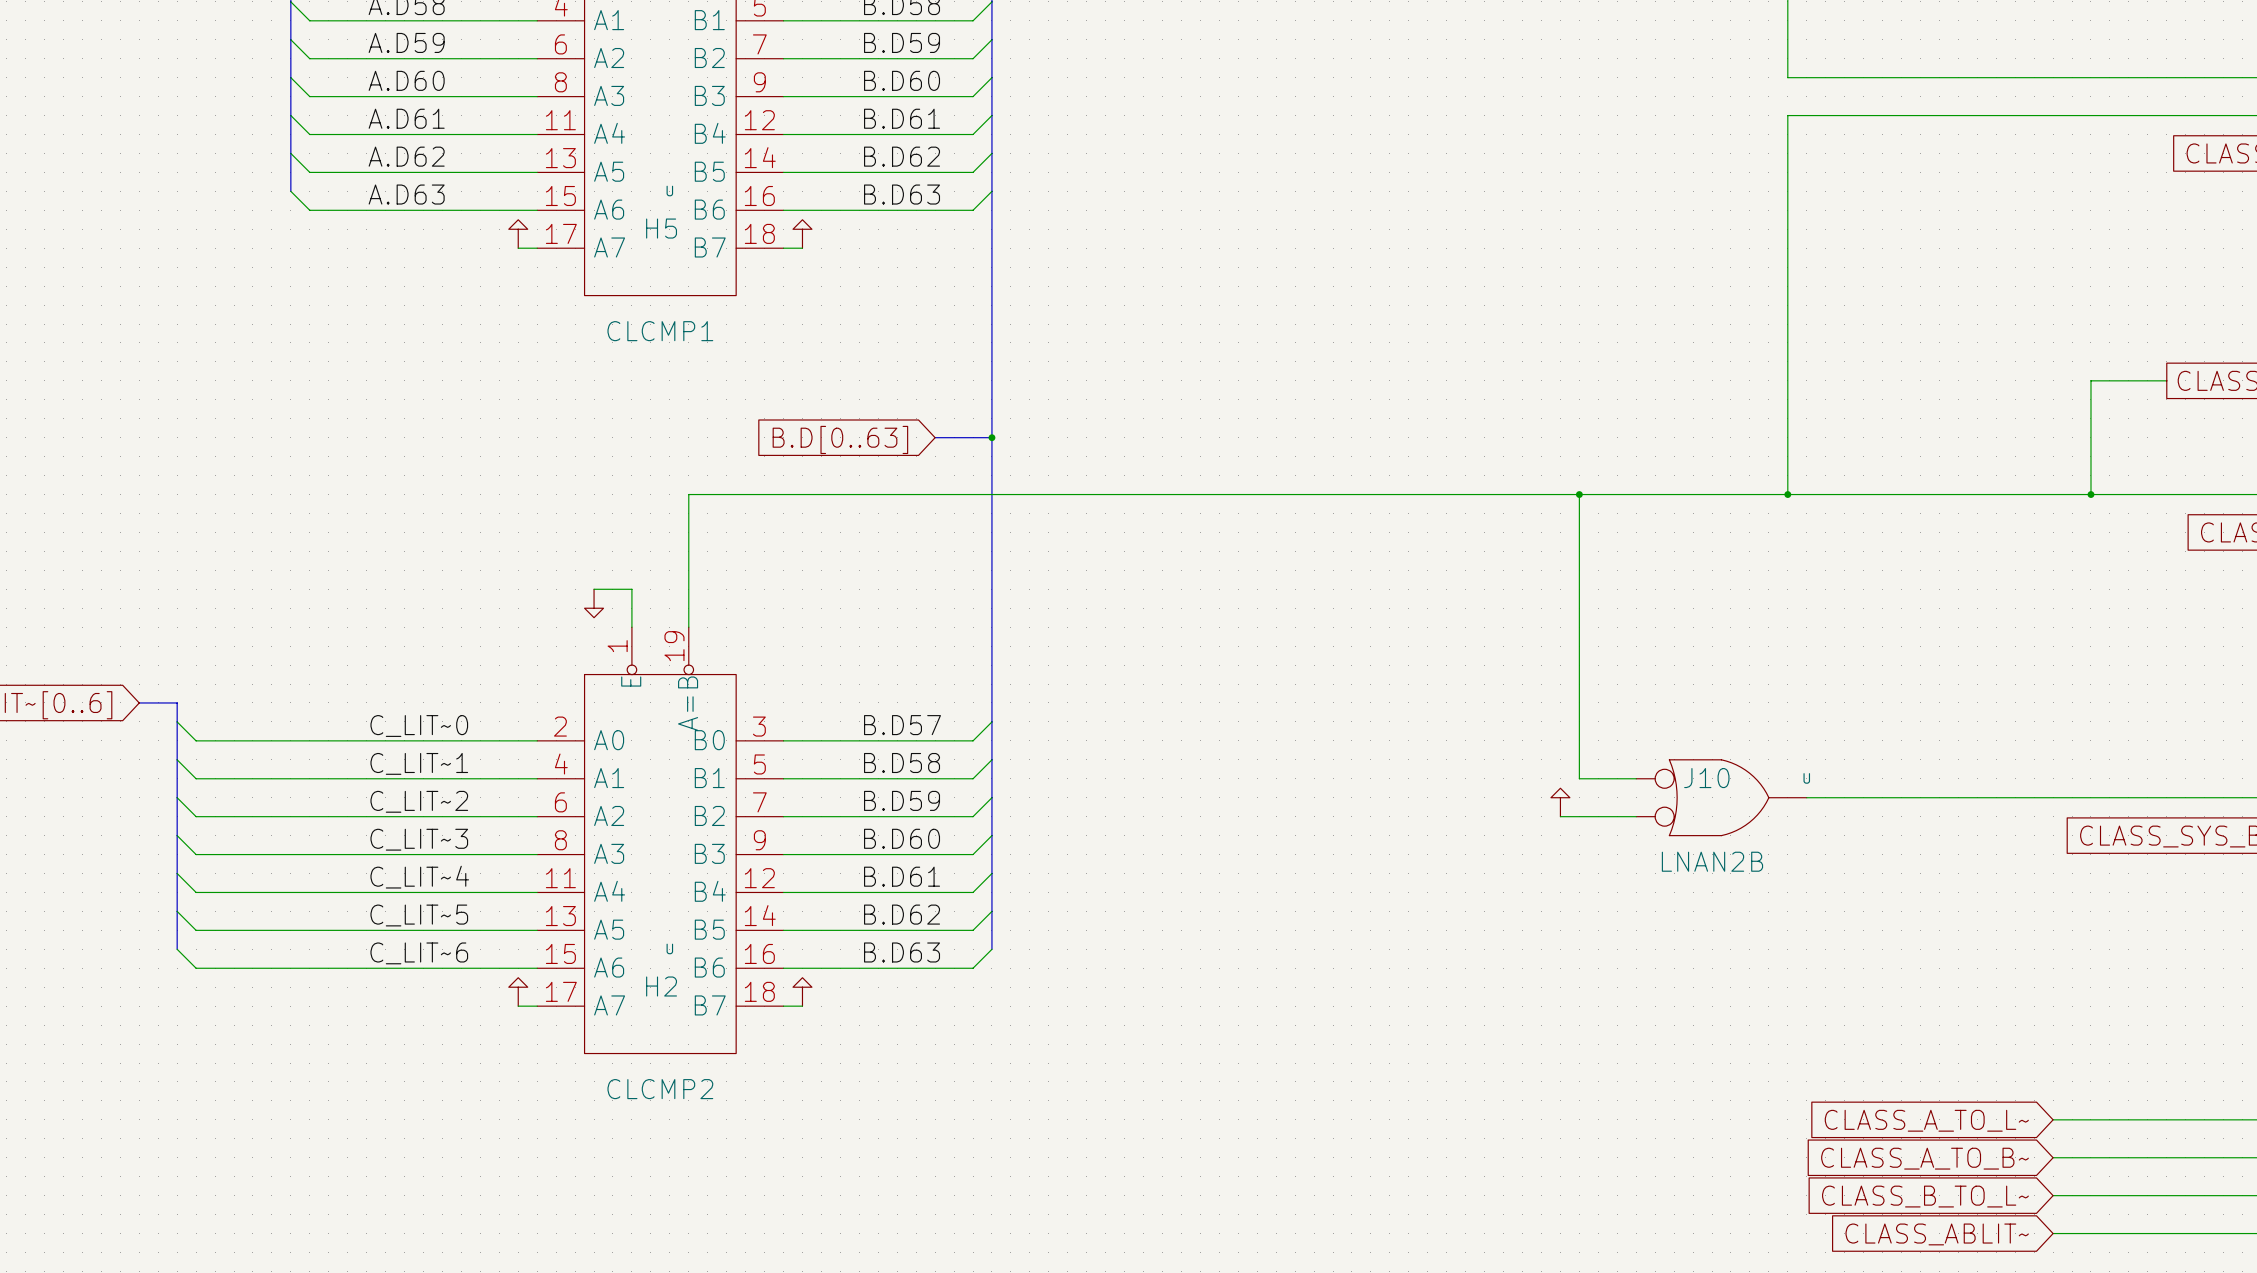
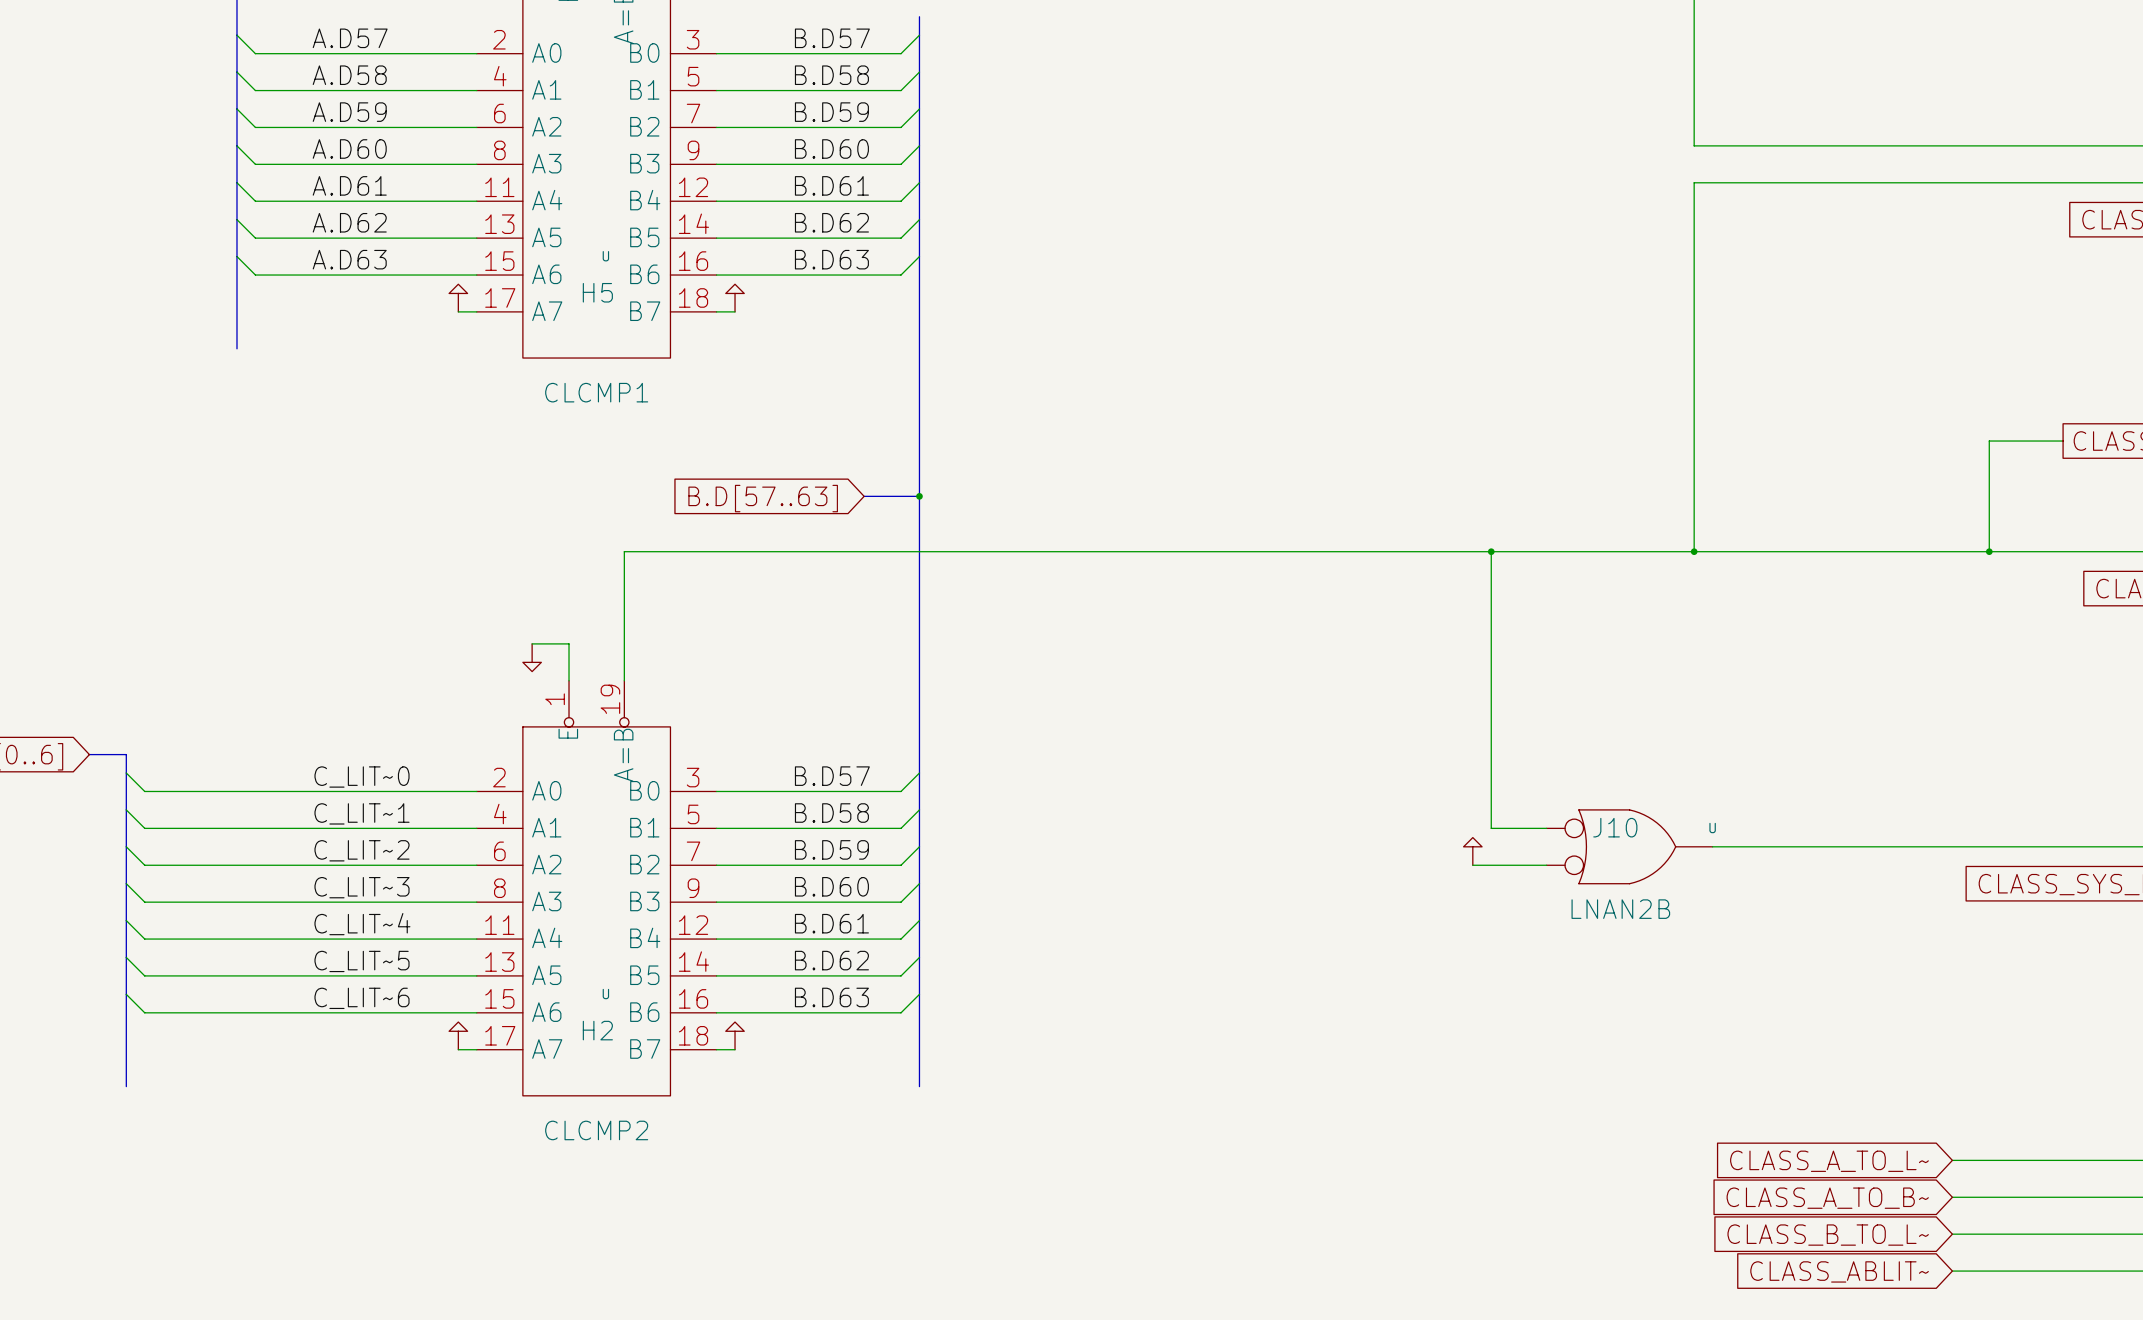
bus: none -> (236, 256) (236, 348)
global label: B.D[0..63] (840, 439) -> B.D[57..63] (763, 498)
bus: none -> (126, 994) (126, 1086)
bus: none -> (919, 994) (919, 1086)

